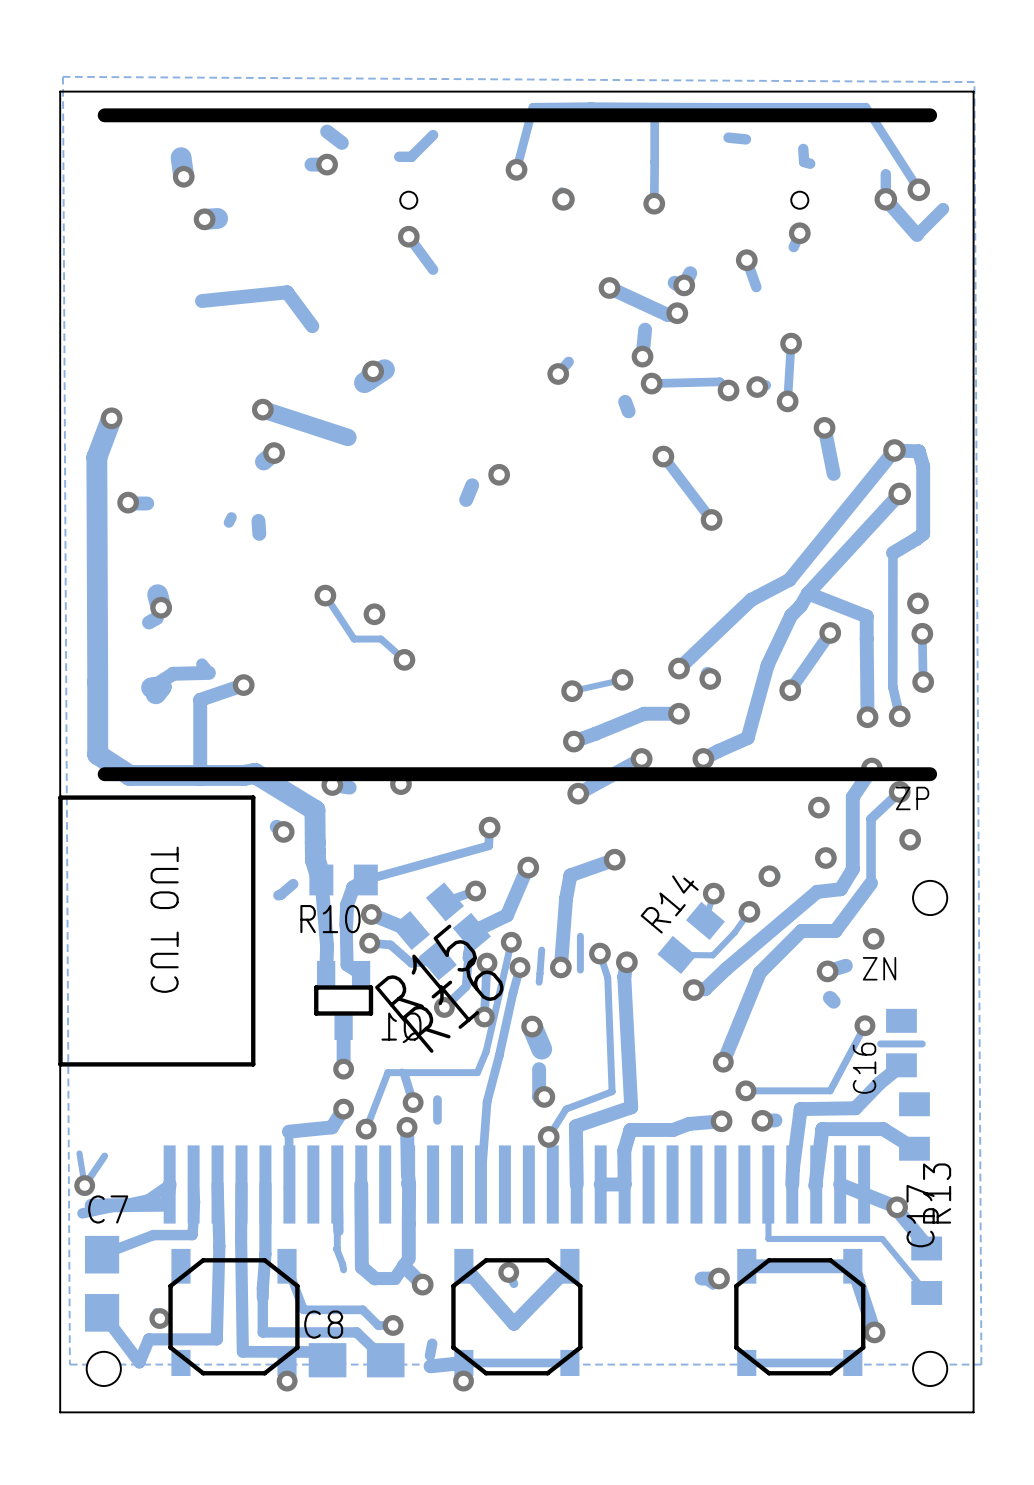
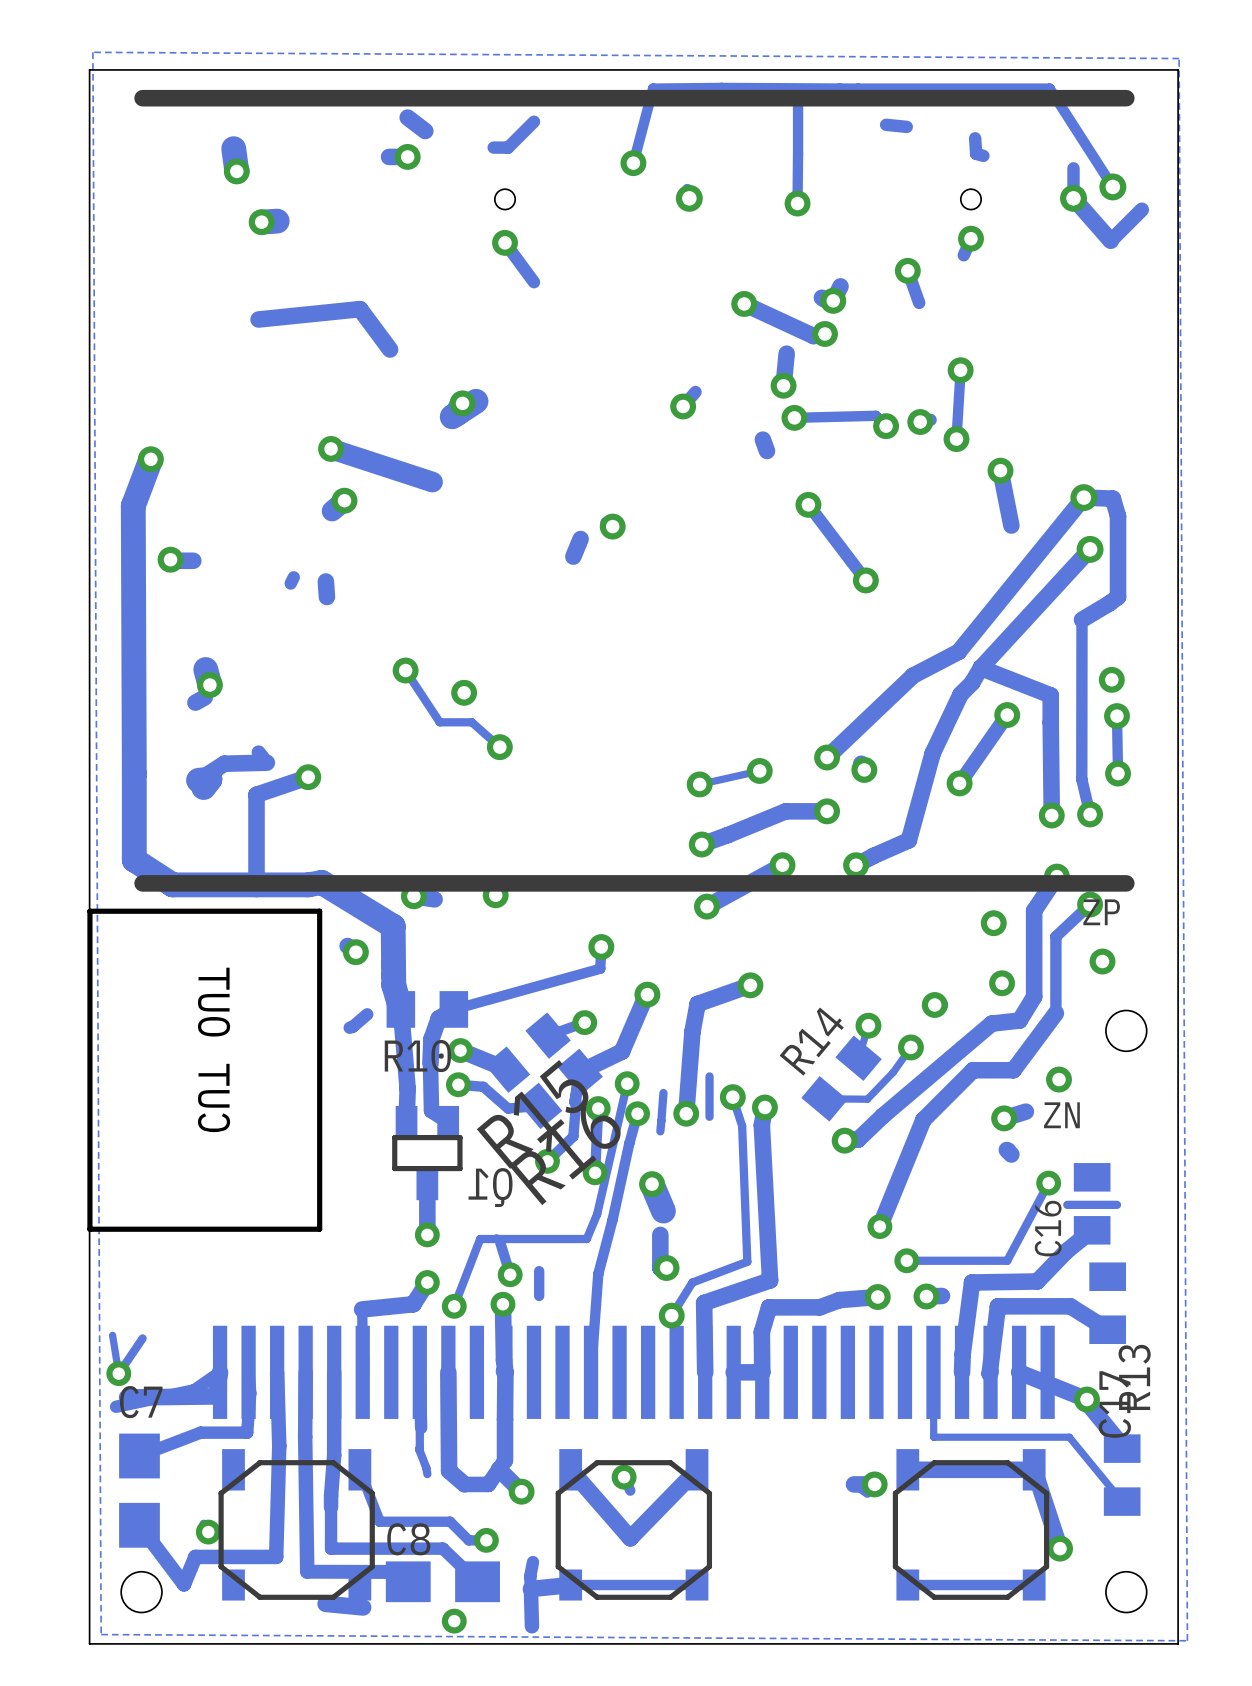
zone outline: (62, 76) (69, 1364) (981, 1364) (974, 82) -> (92, 52) (101, 1634) (1187, 1640) (1179, 58)
track: none -> (530, 1576) (531, 1626)
track: none -> (325, 1603) (363, 1607)
via: (287, 1381) -> none
via: (463, 1381) -> none
via: none -> (454, 1621)

